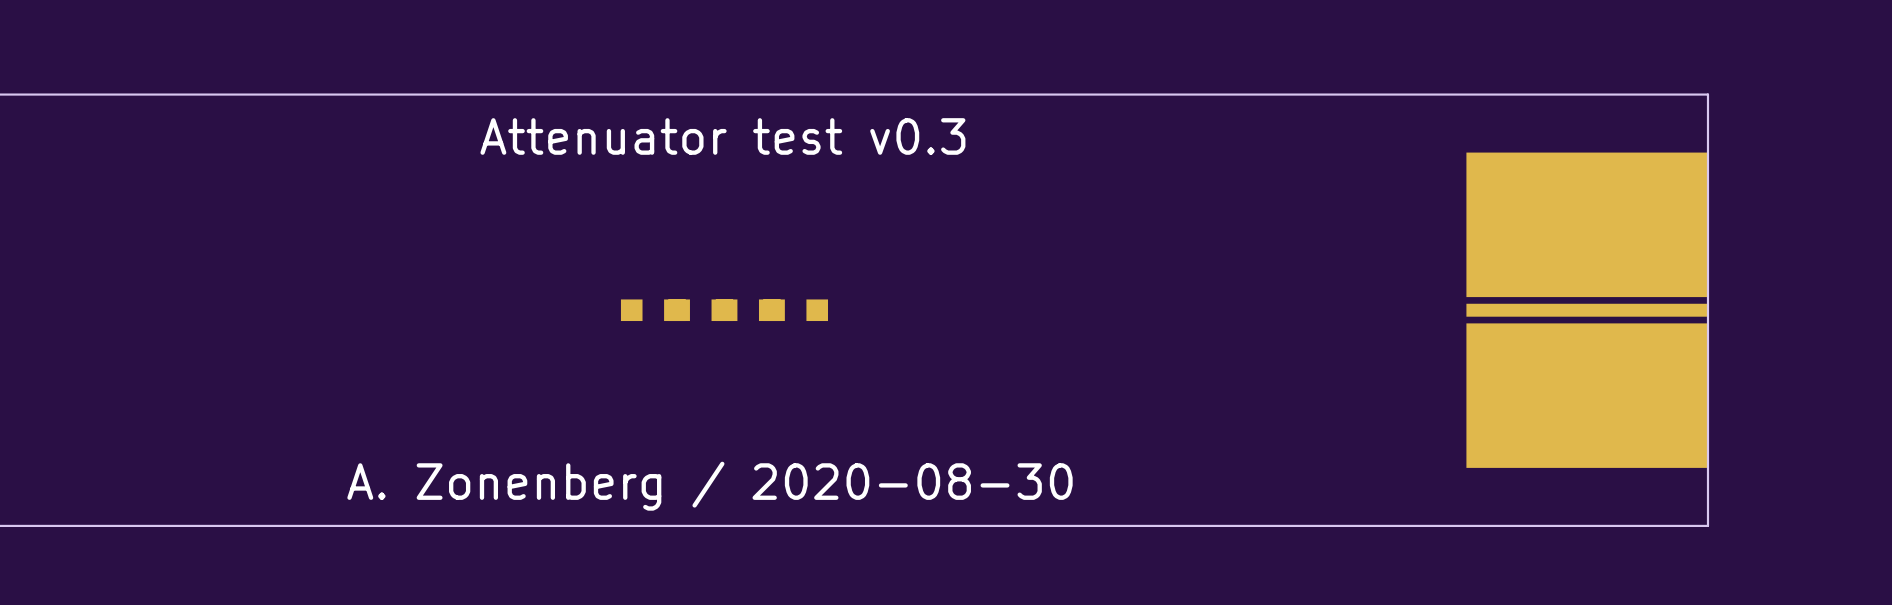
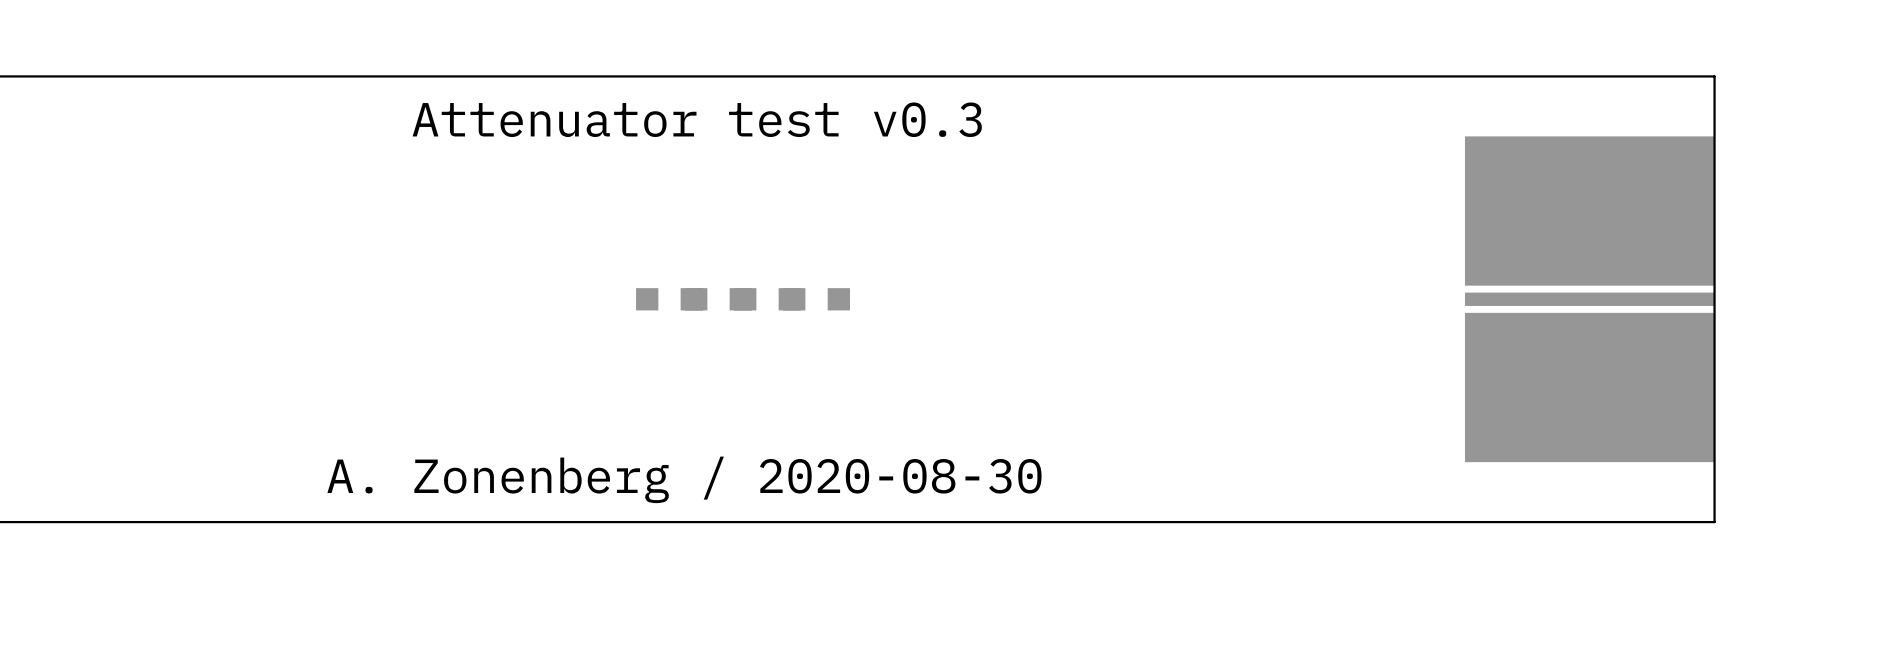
board edge: (1664, 94) (1707, 94) (1707, 525) (1664, 525) -> (1714, 76) (1714, 522)
text position: Attenuator test v0.3 (722, 136) -> Attenuator test v0.3 (697, 119)
part position: (1587, 310) -> (1589, 299)
text position: A. Zonenberg / 2020-08-30 (709, 486) -> A. Zonenberg / 2020-08-30 (684, 479)

